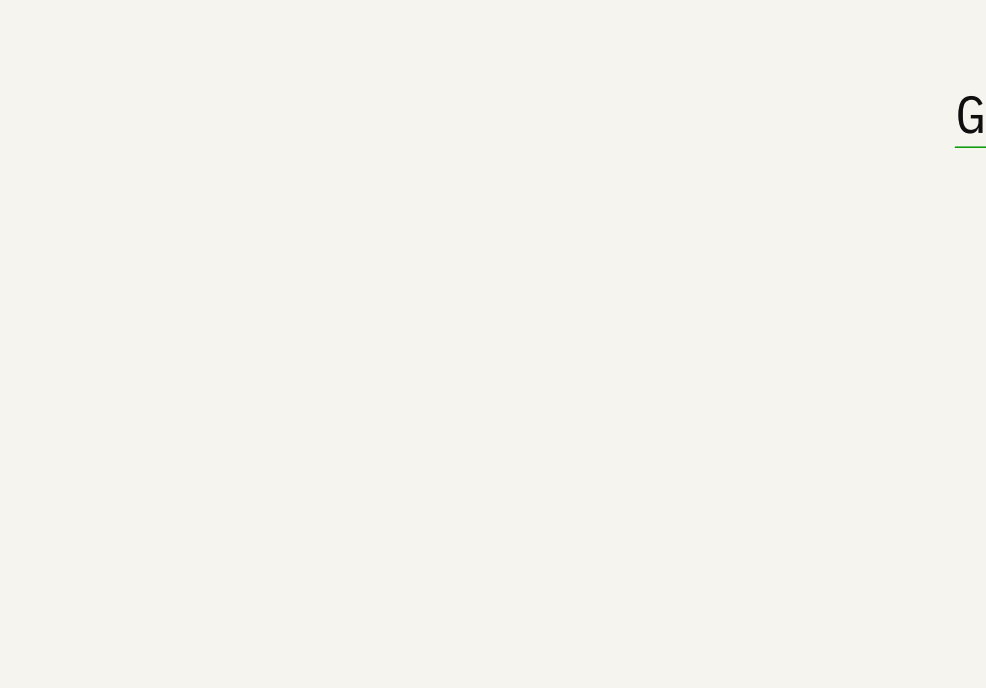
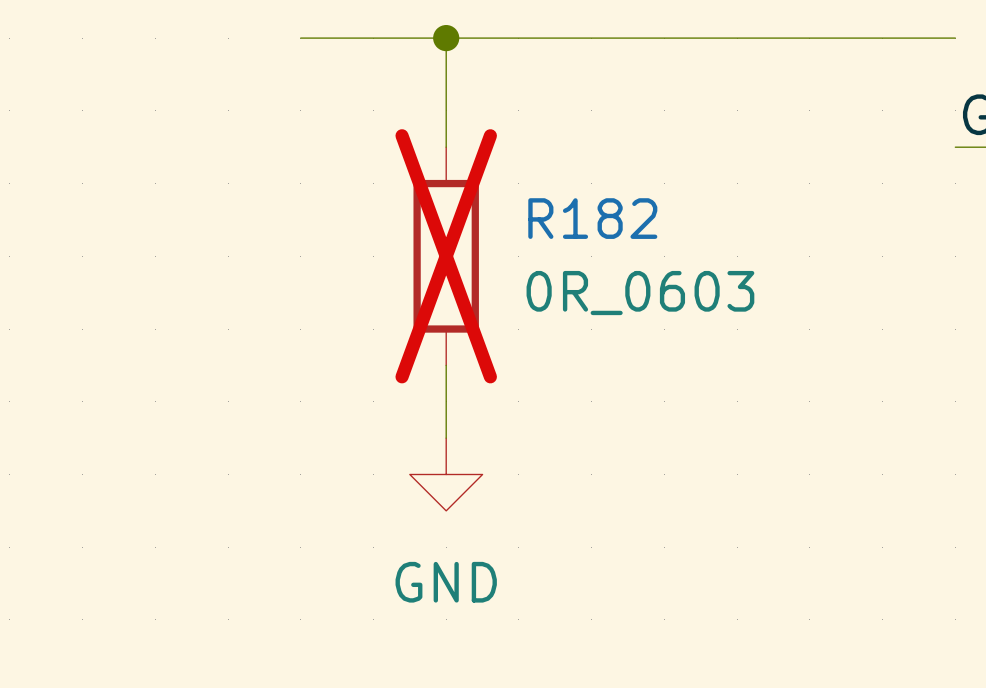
wire: none -> (300, 38) (955, 38)
wire: none -> (446, 38) (446, 147)
junction: none -> (446, 38)
R182: none -> 0R_0603 (446, 256)
wire: none -> (446, 365) (446, 438)
power symbol: none -> GND (446, 474)

